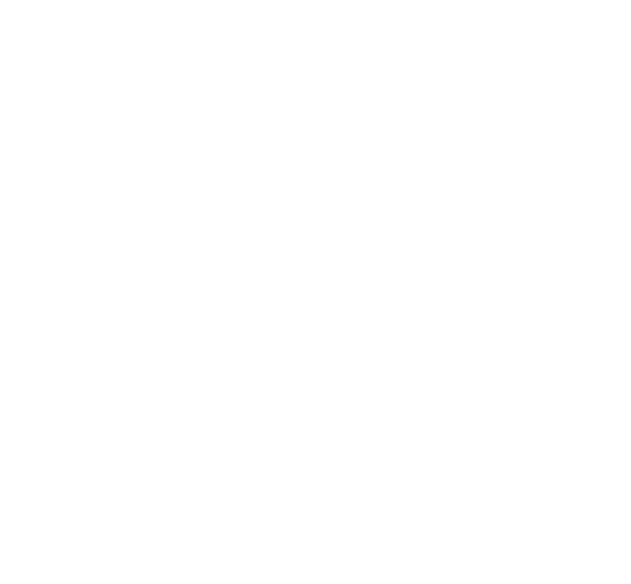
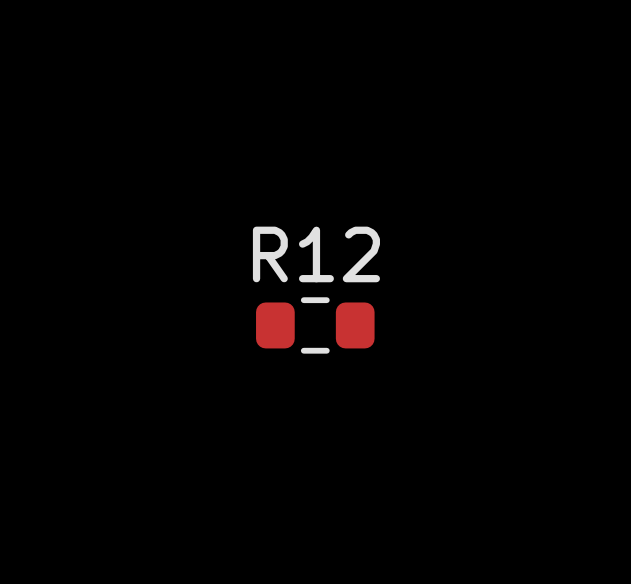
R12: none -> (315, 325)

